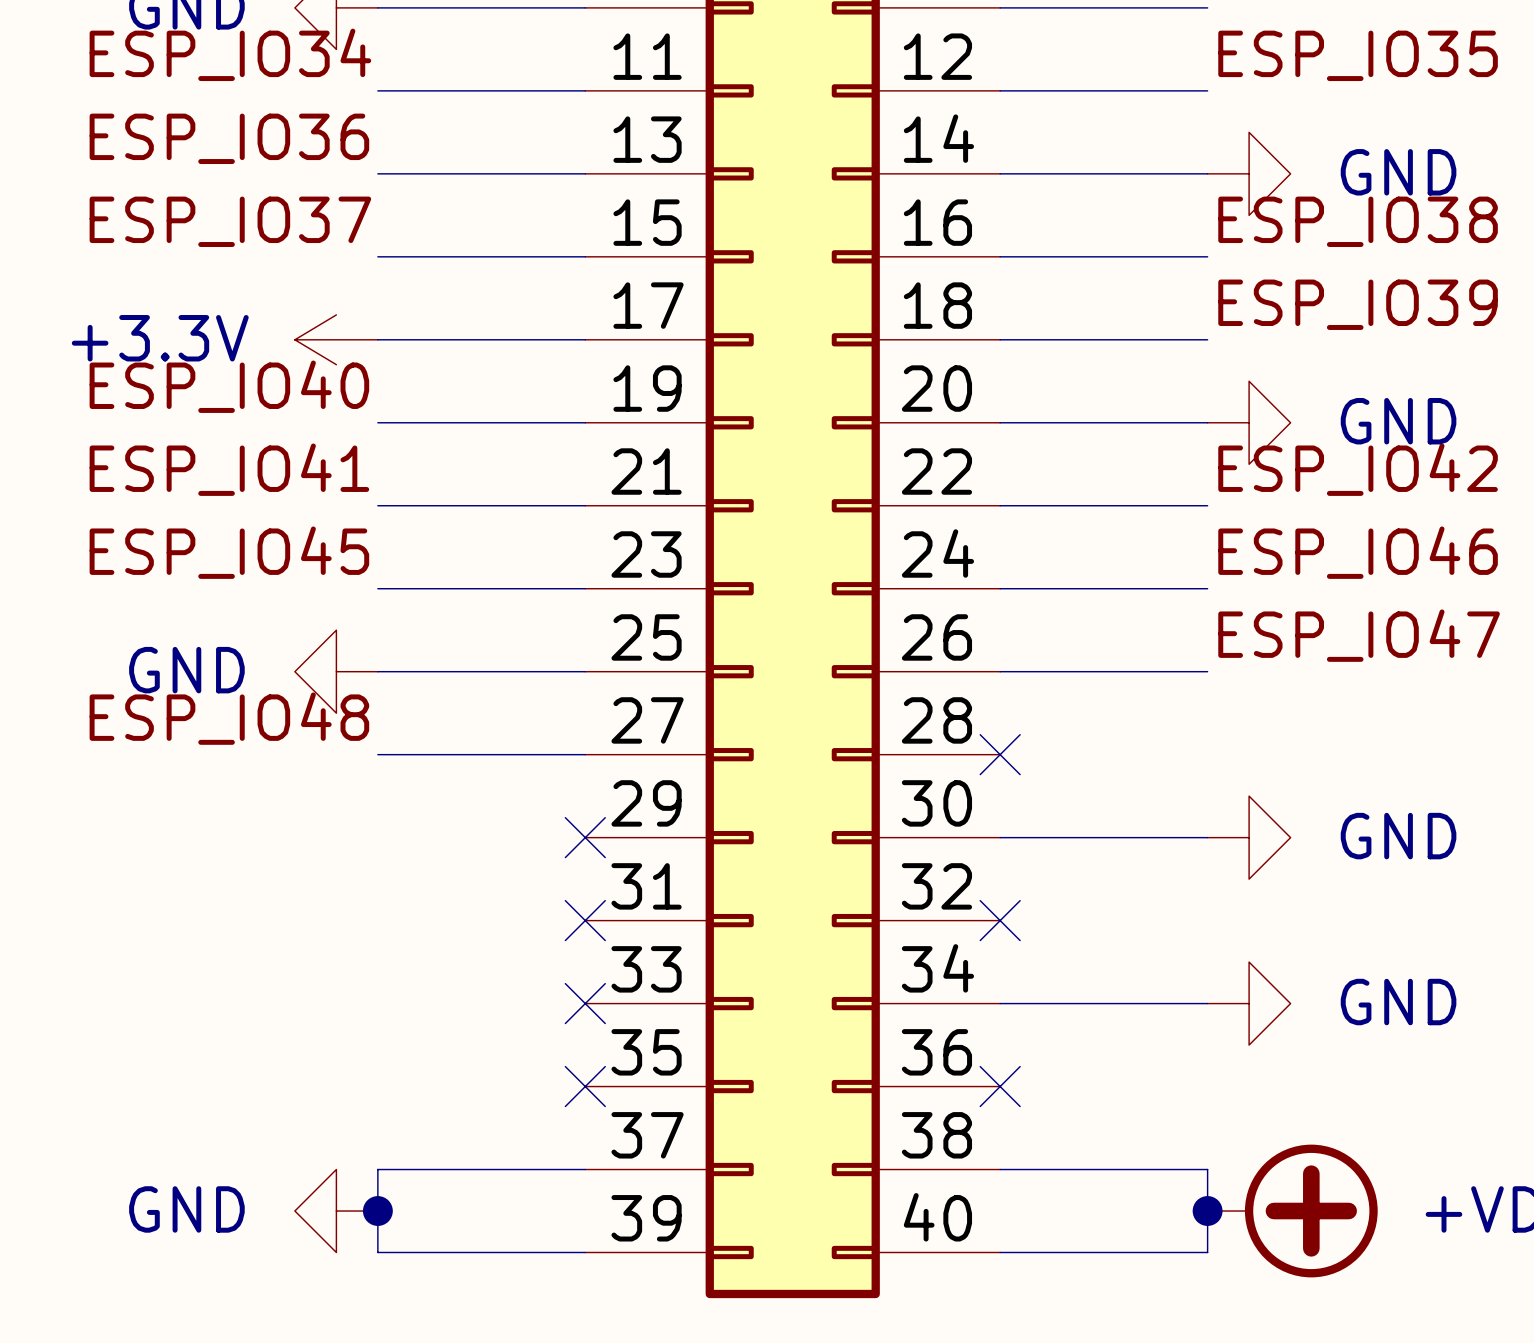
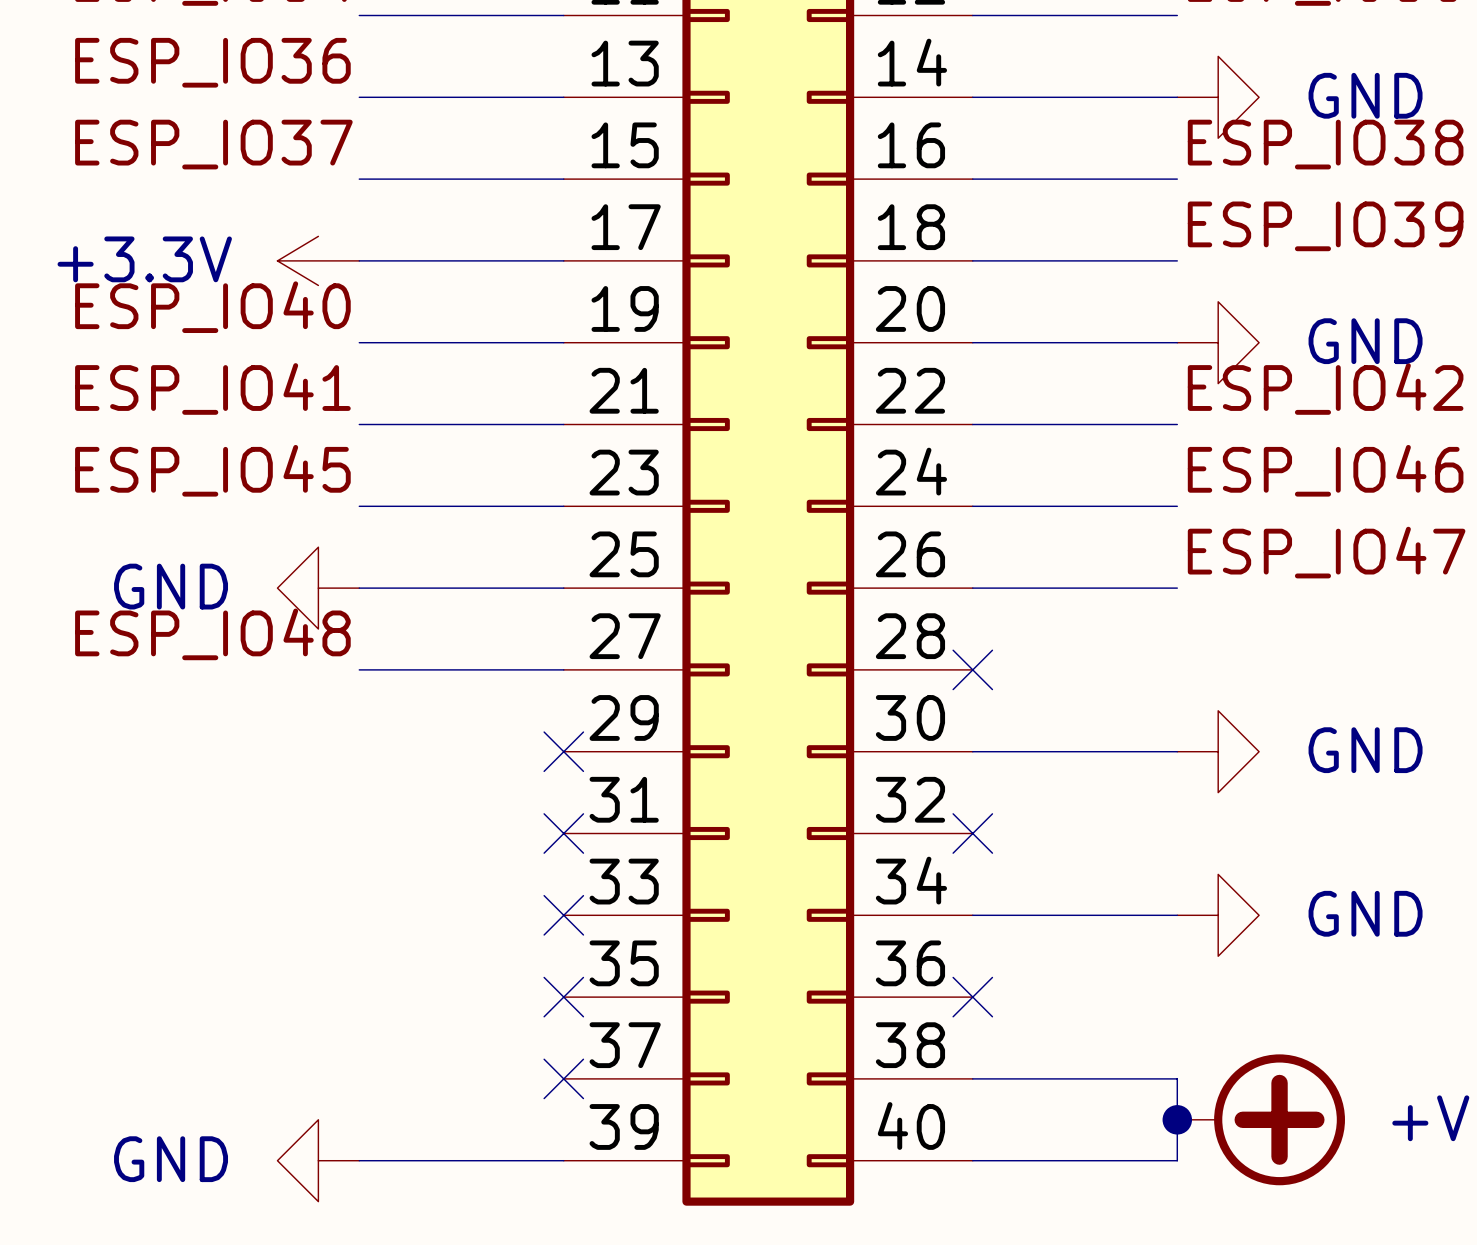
wire: (585, 1169) (377, 1169) (377, 1252) -> none
no-connect mark: none -> (563, 1078)
power symbol position: GND (336, 1211) -> GND (318, 1160)
junction: (377, 1211) -> none

